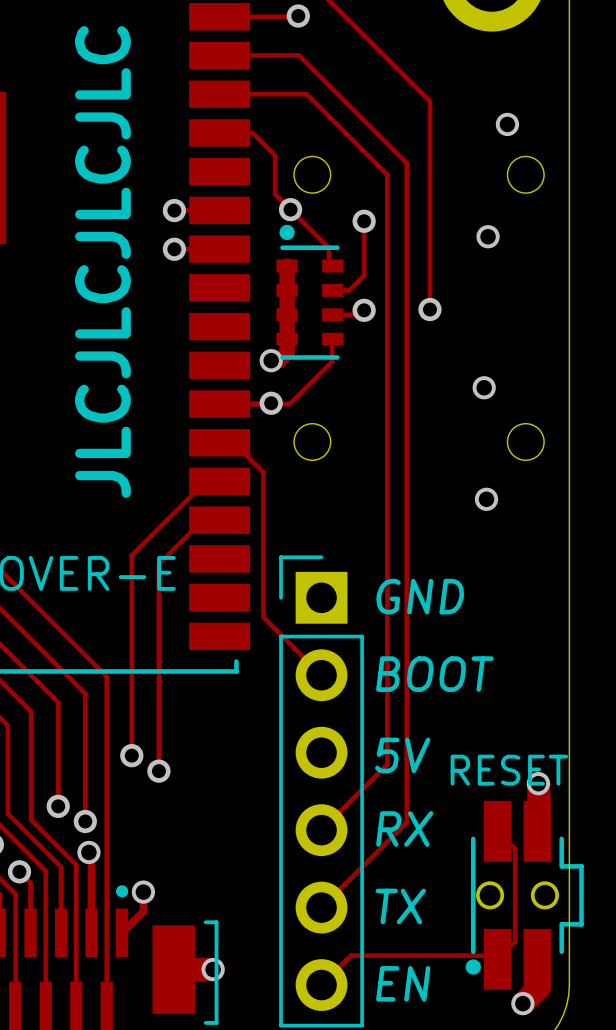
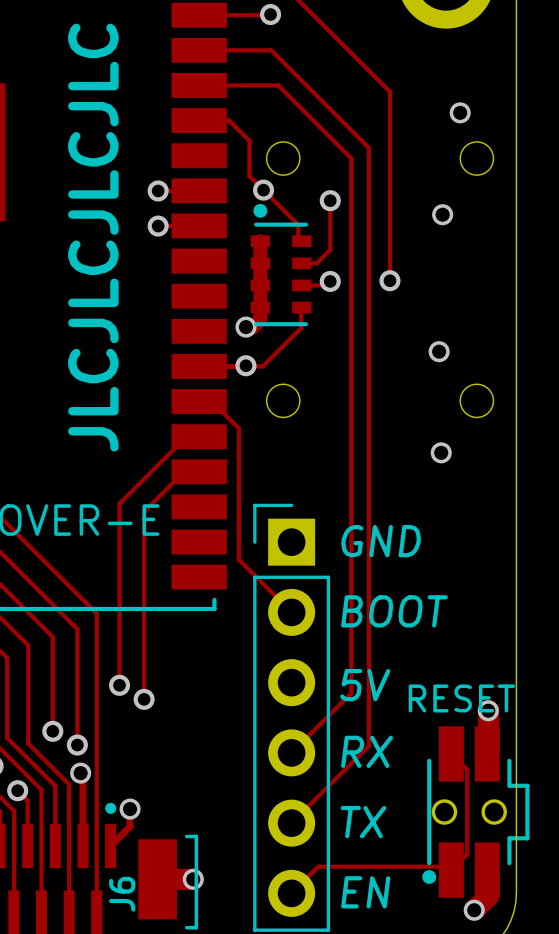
J6 name: none -> J6 (122, 894)

